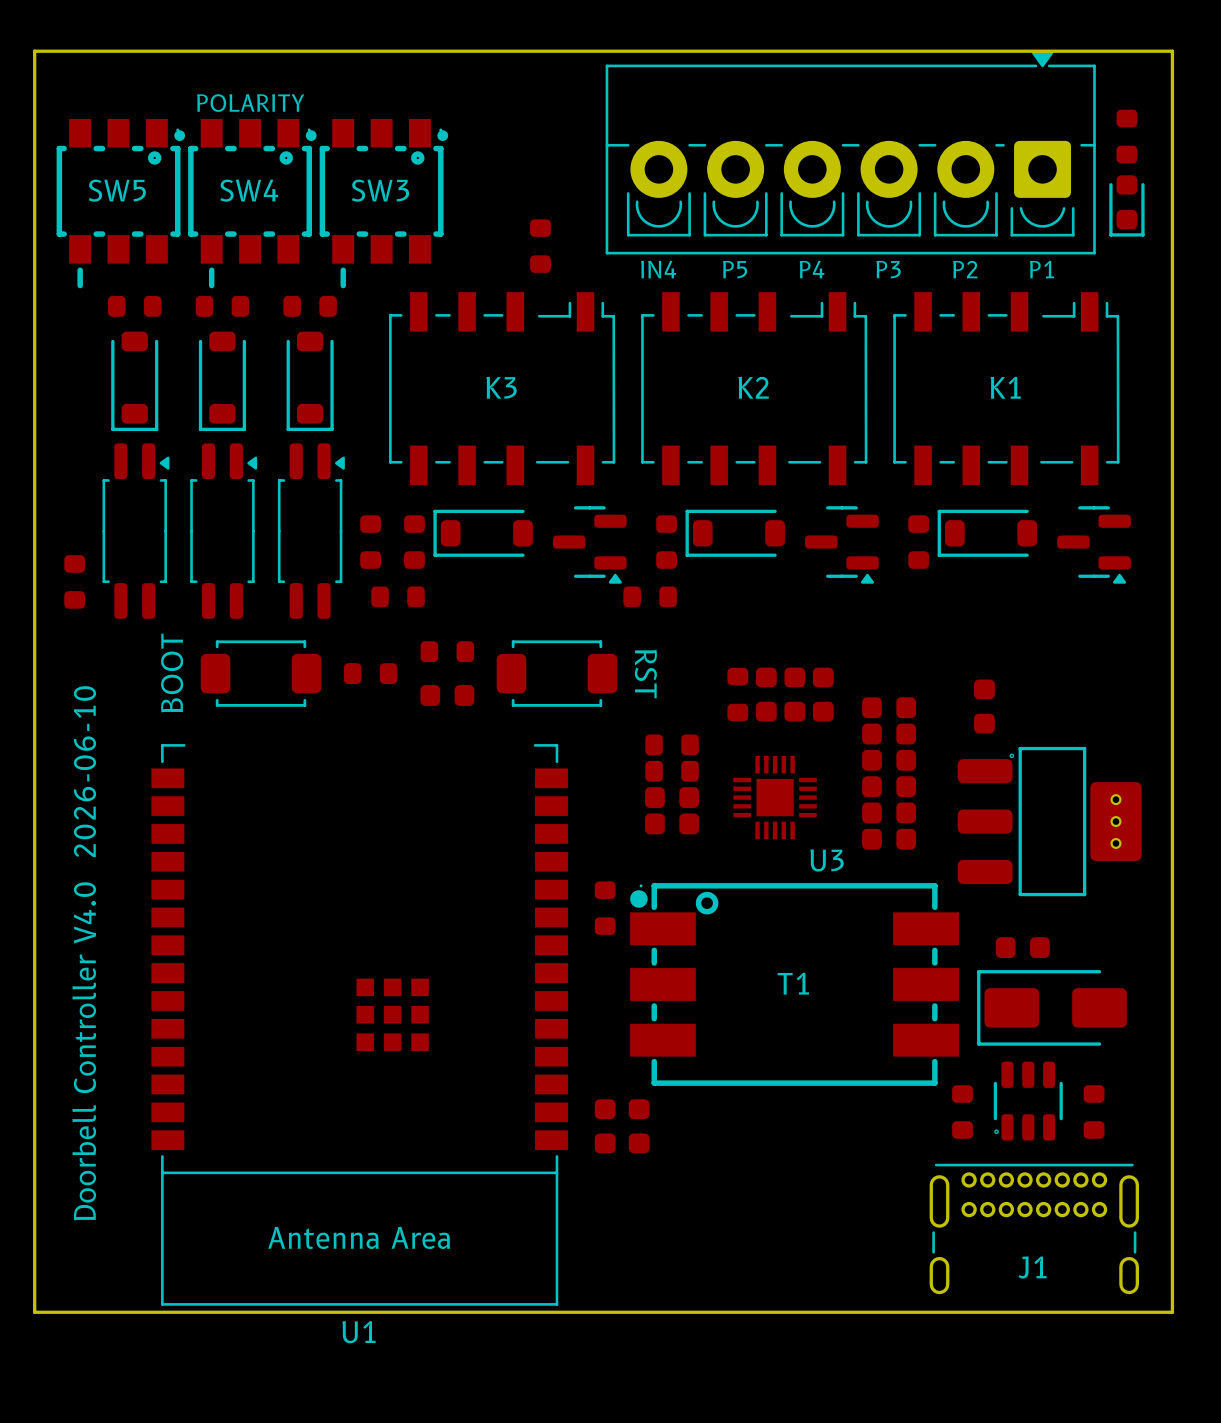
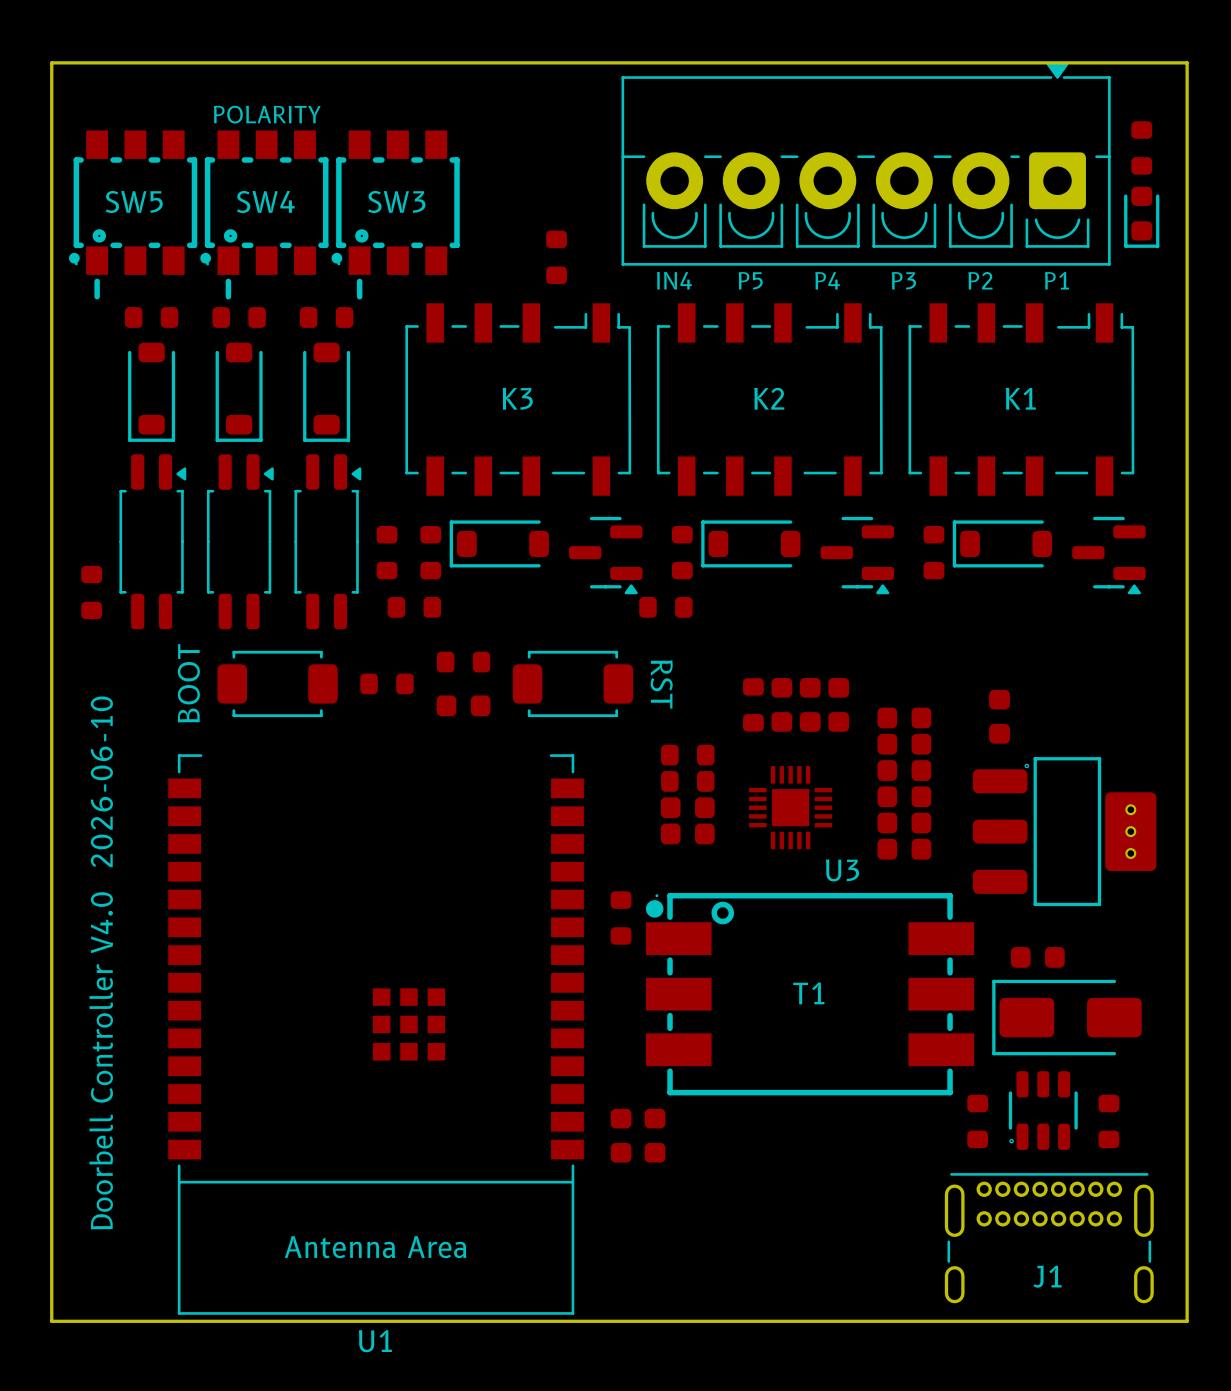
SW5 rotation: 0° (120, 191) -> 180° (133, 202)
SW4 rotation: 0° (252, 191) -> 180° (264, 202)
SW3 rotation: 0° (383, 191) -> 180° (395, 202)

